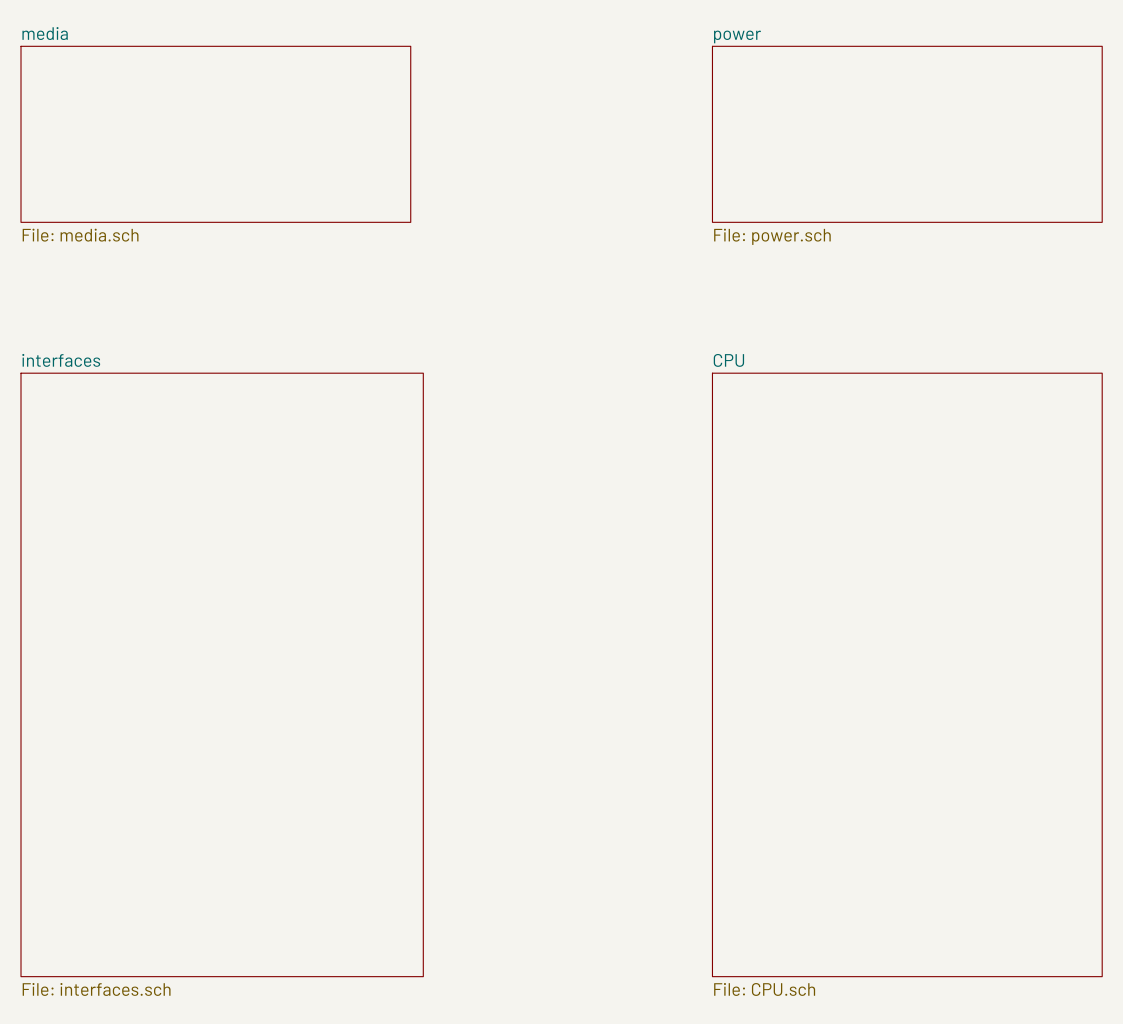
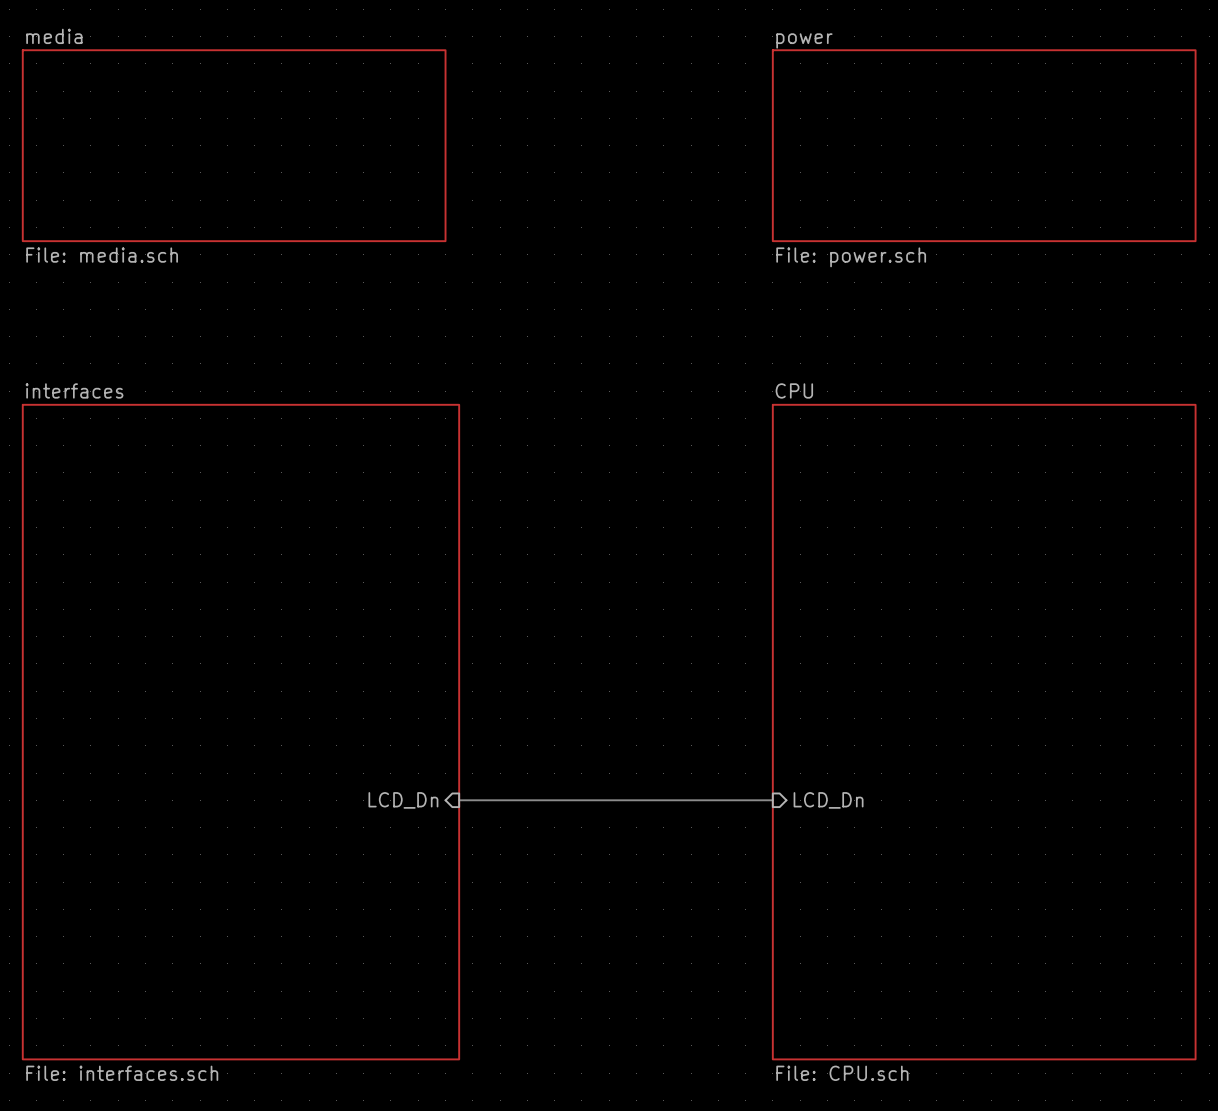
sheet pin: none -> LCD_Dn (403, 800)
bus: none -> (459, 800) (772, 800)
sheet pin: none -> LCD_Dn (828, 800)

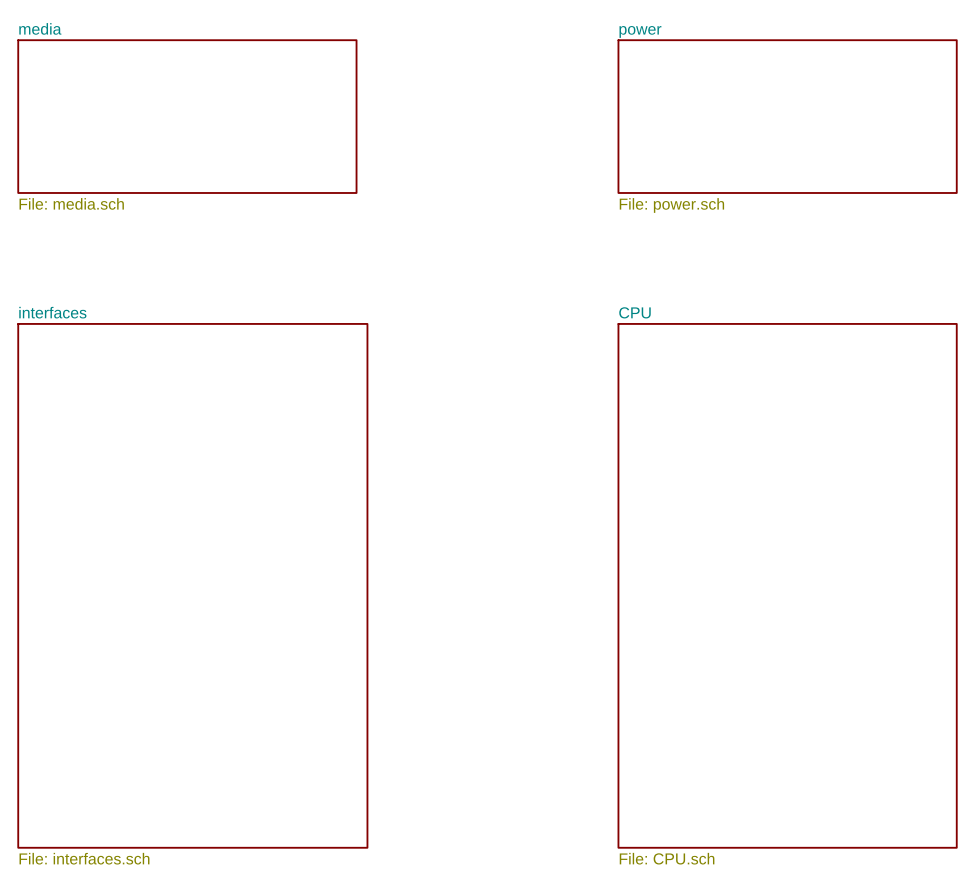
sheet pin: LCD_Dn (403, 800) -> none
bus: (459, 800) (772, 800) -> none
sheet pin: LCD_Dn (828, 800) -> none

